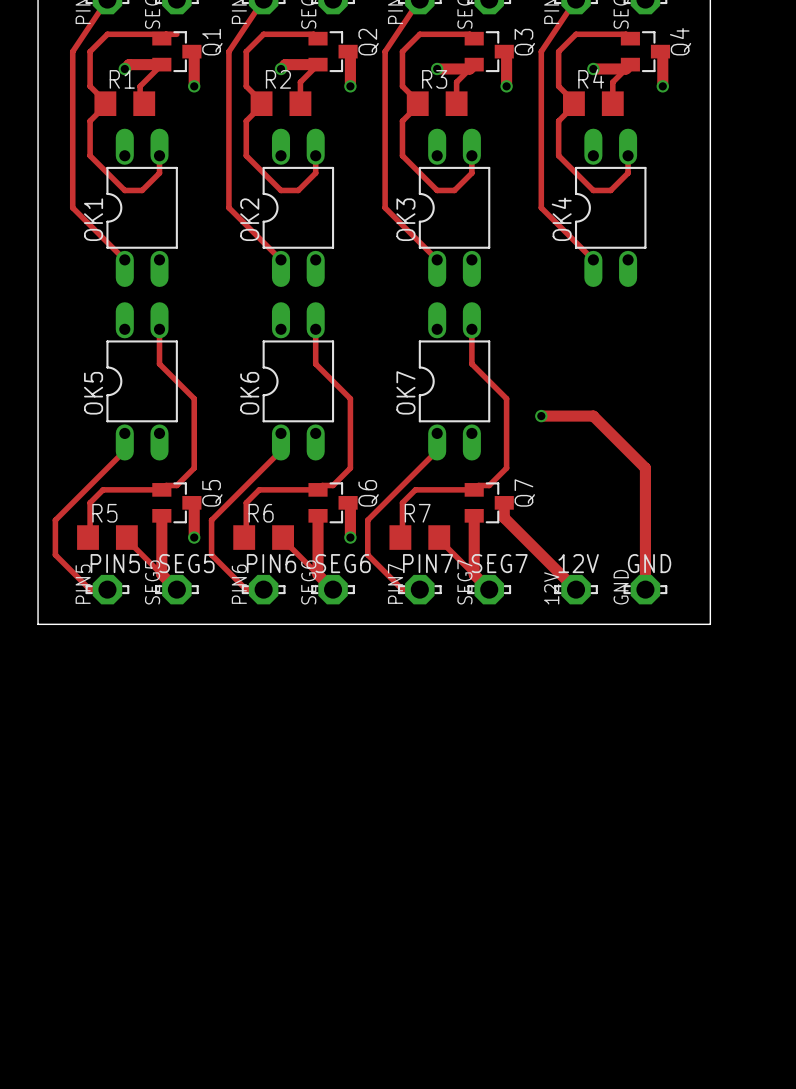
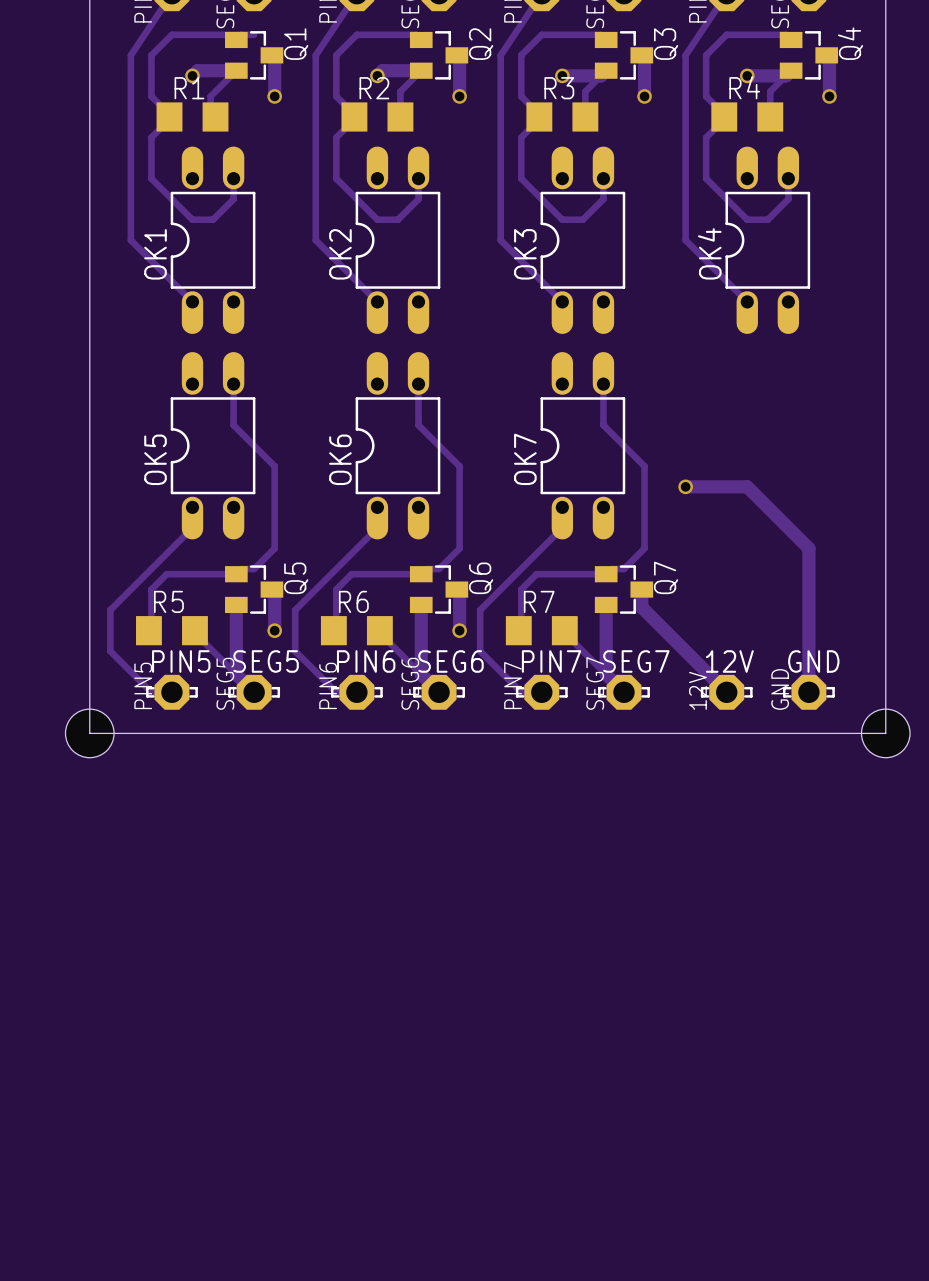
hole: none -> (89, 733)
hole: none -> (885, 733)

